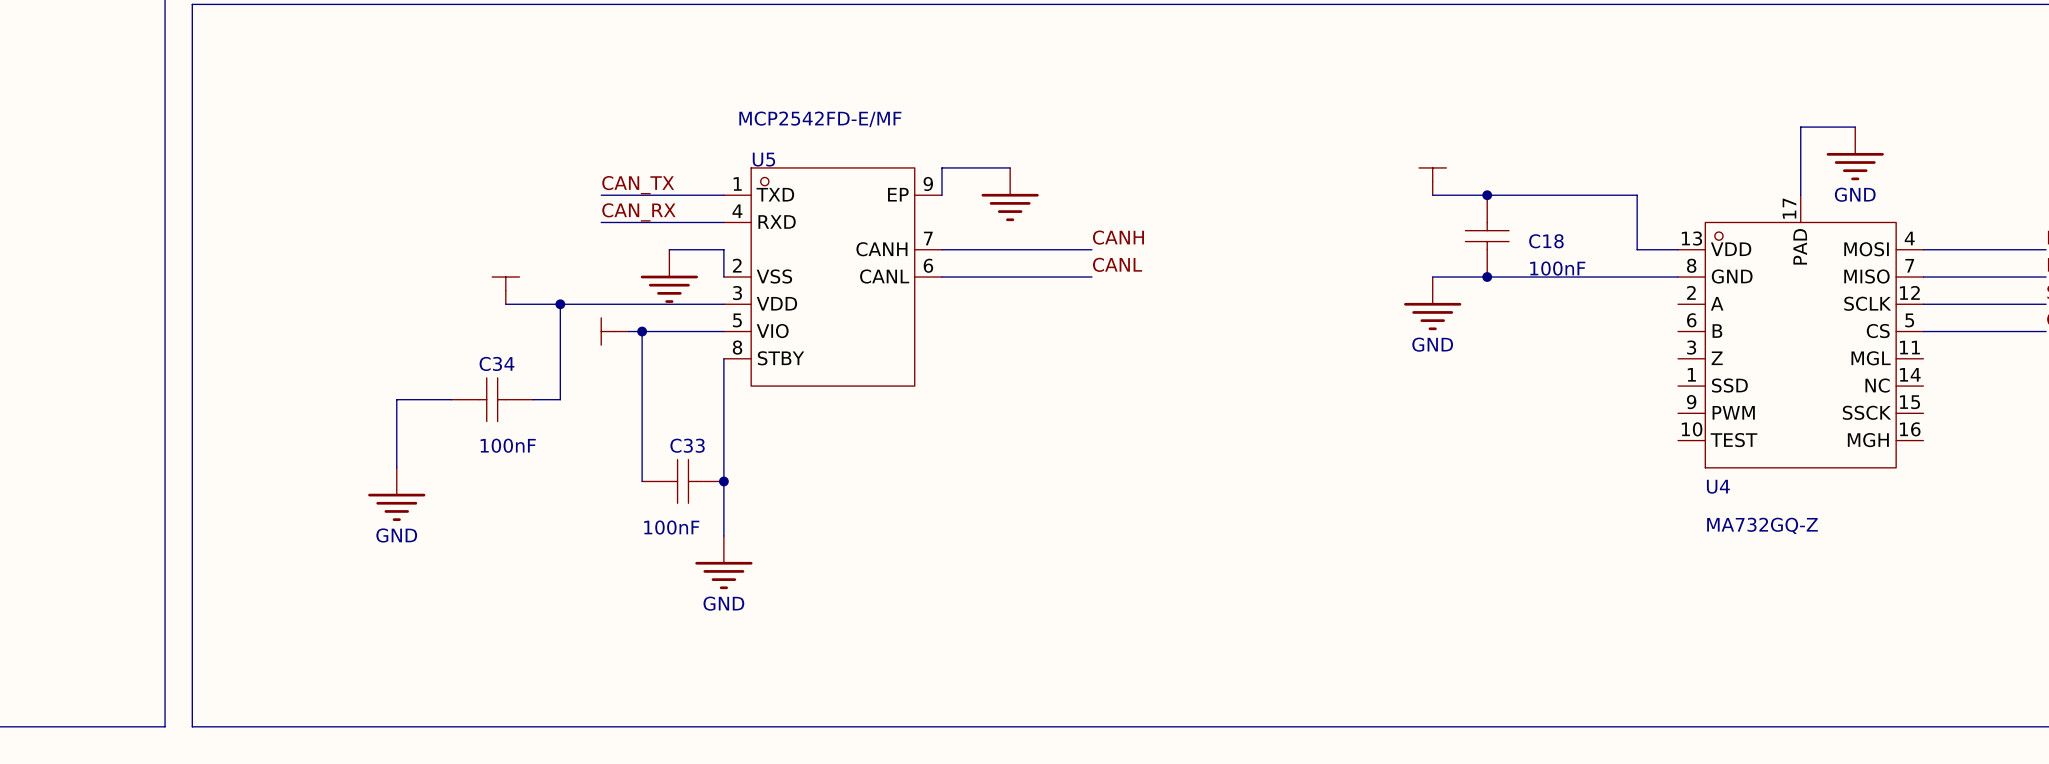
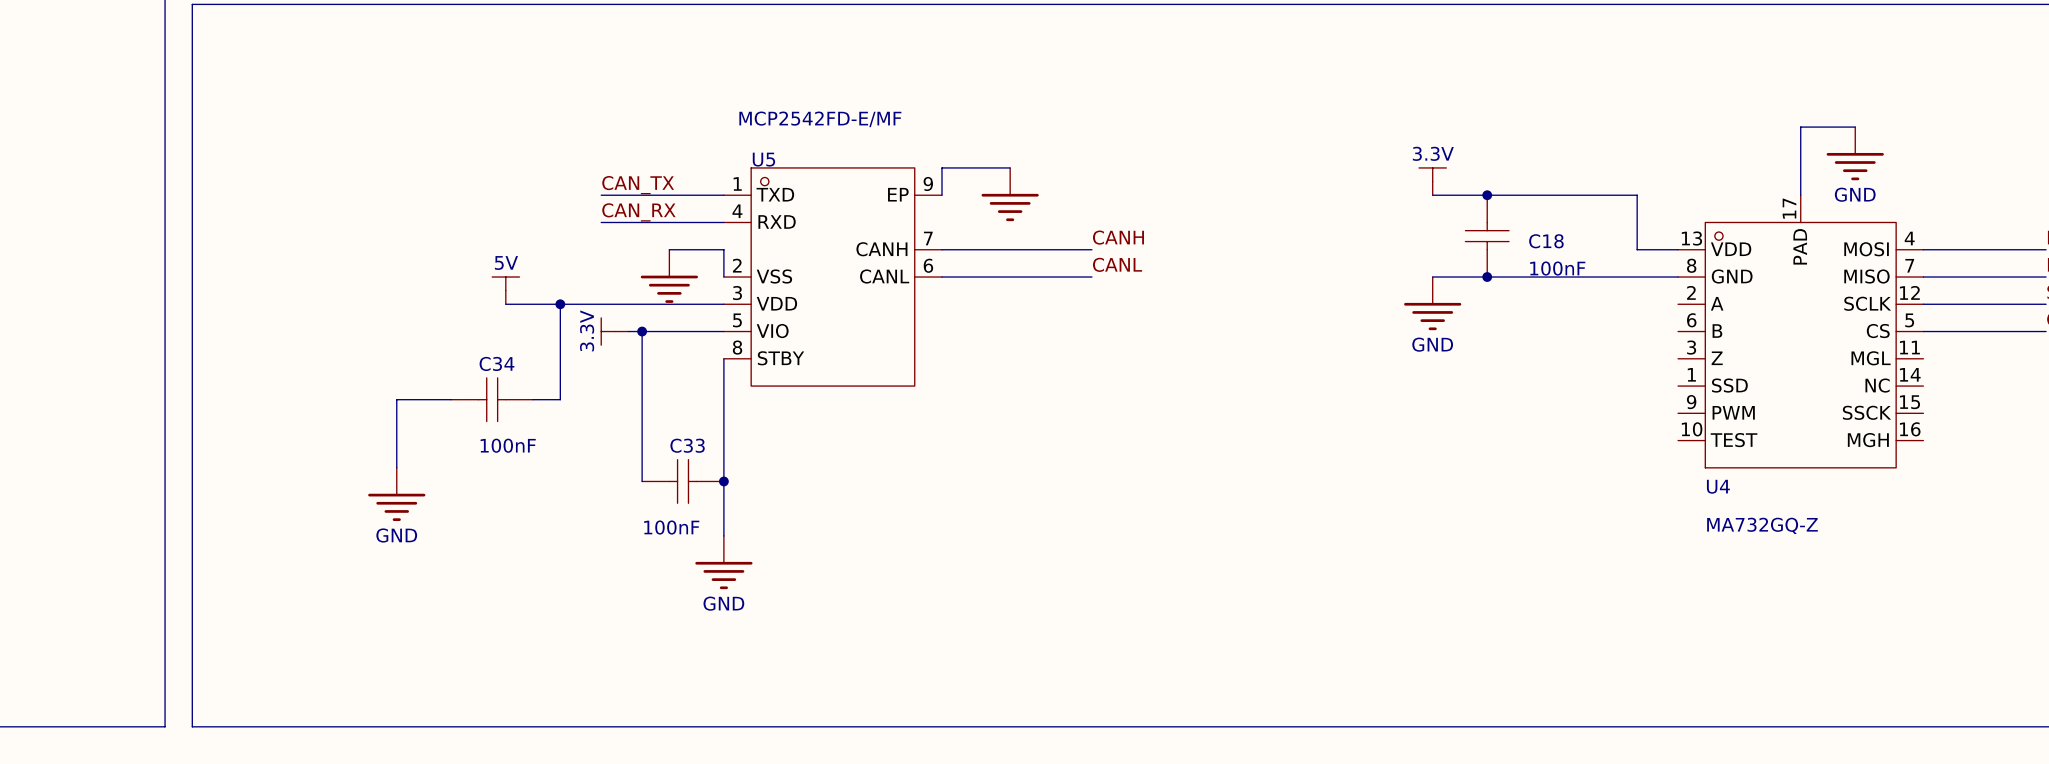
3.3V name: none -> 3.3V (1433, 153)
5V name: none -> 5V (506, 263)
3.3V name: none -> 3.3V (587, 330)

